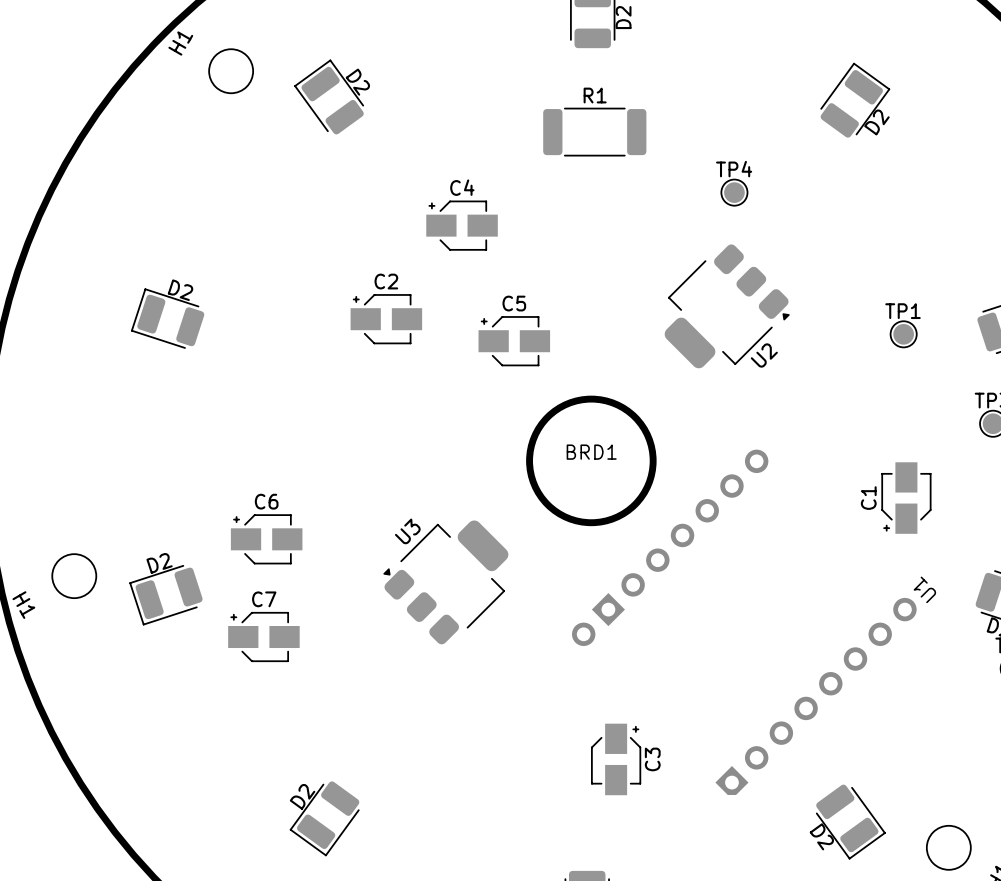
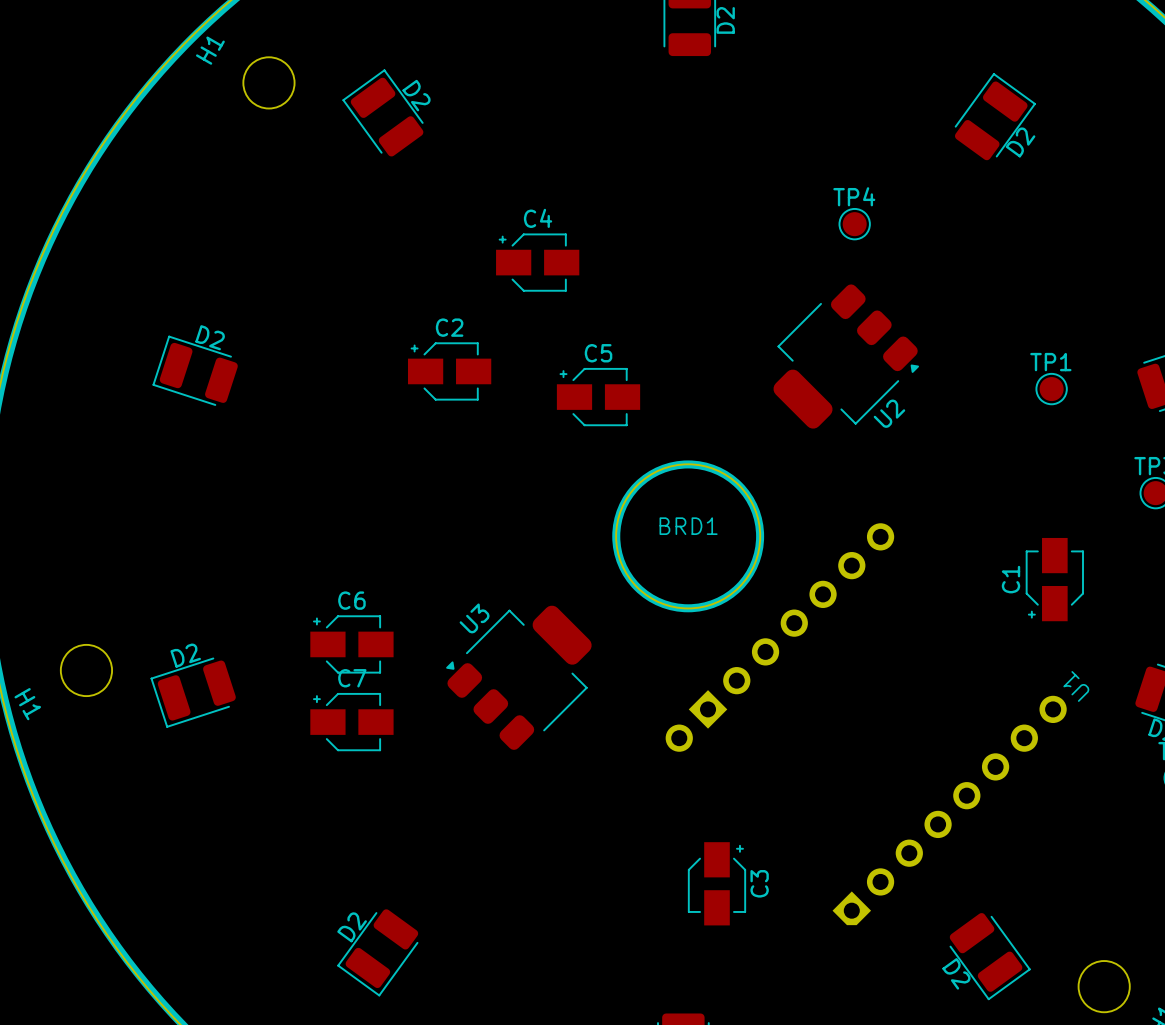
R1: (594, 132) -> none
C6 position: (266, 539) -> (351, 644)
C7 position: (263, 637) -> (351, 722)

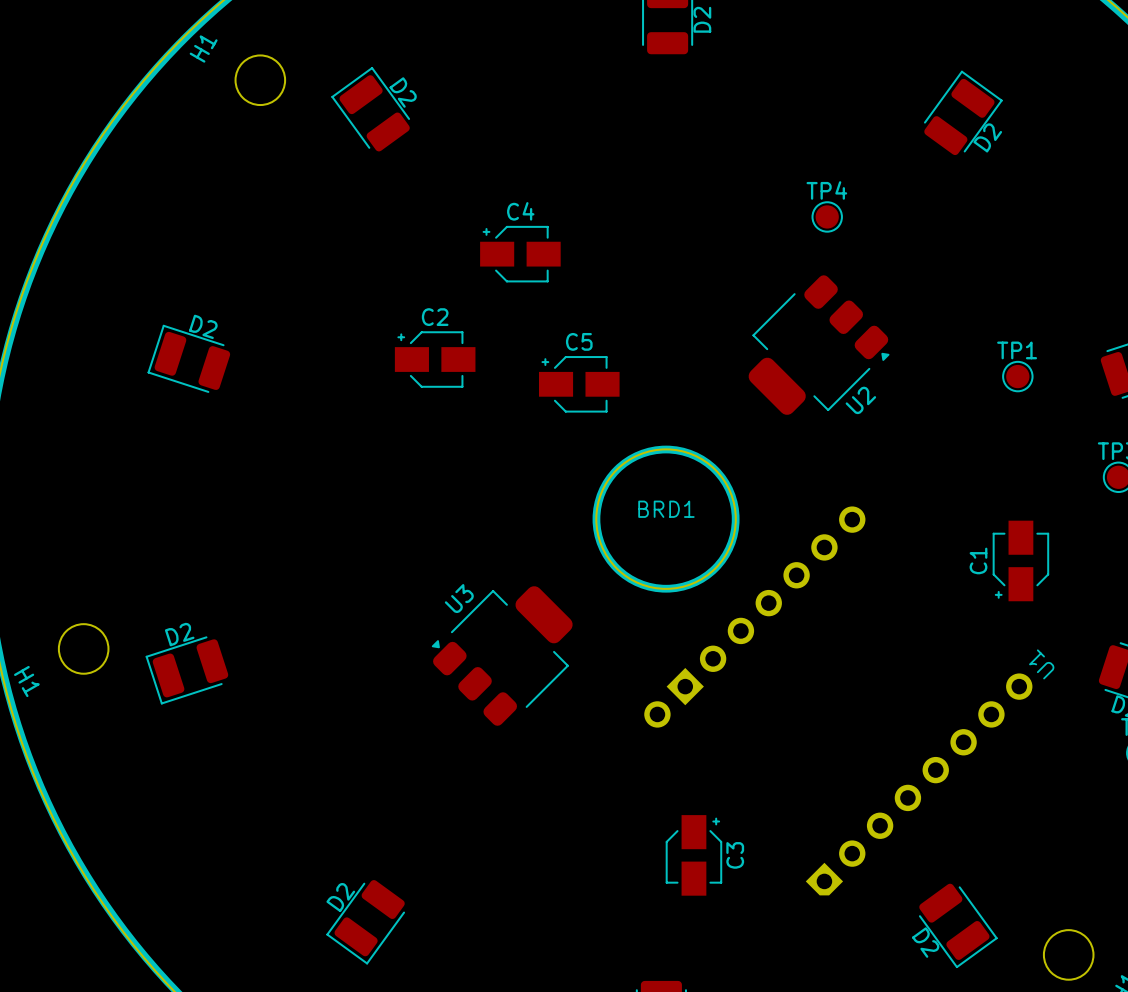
C6: (351, 644) -> none
C7: (351, 722) -> none

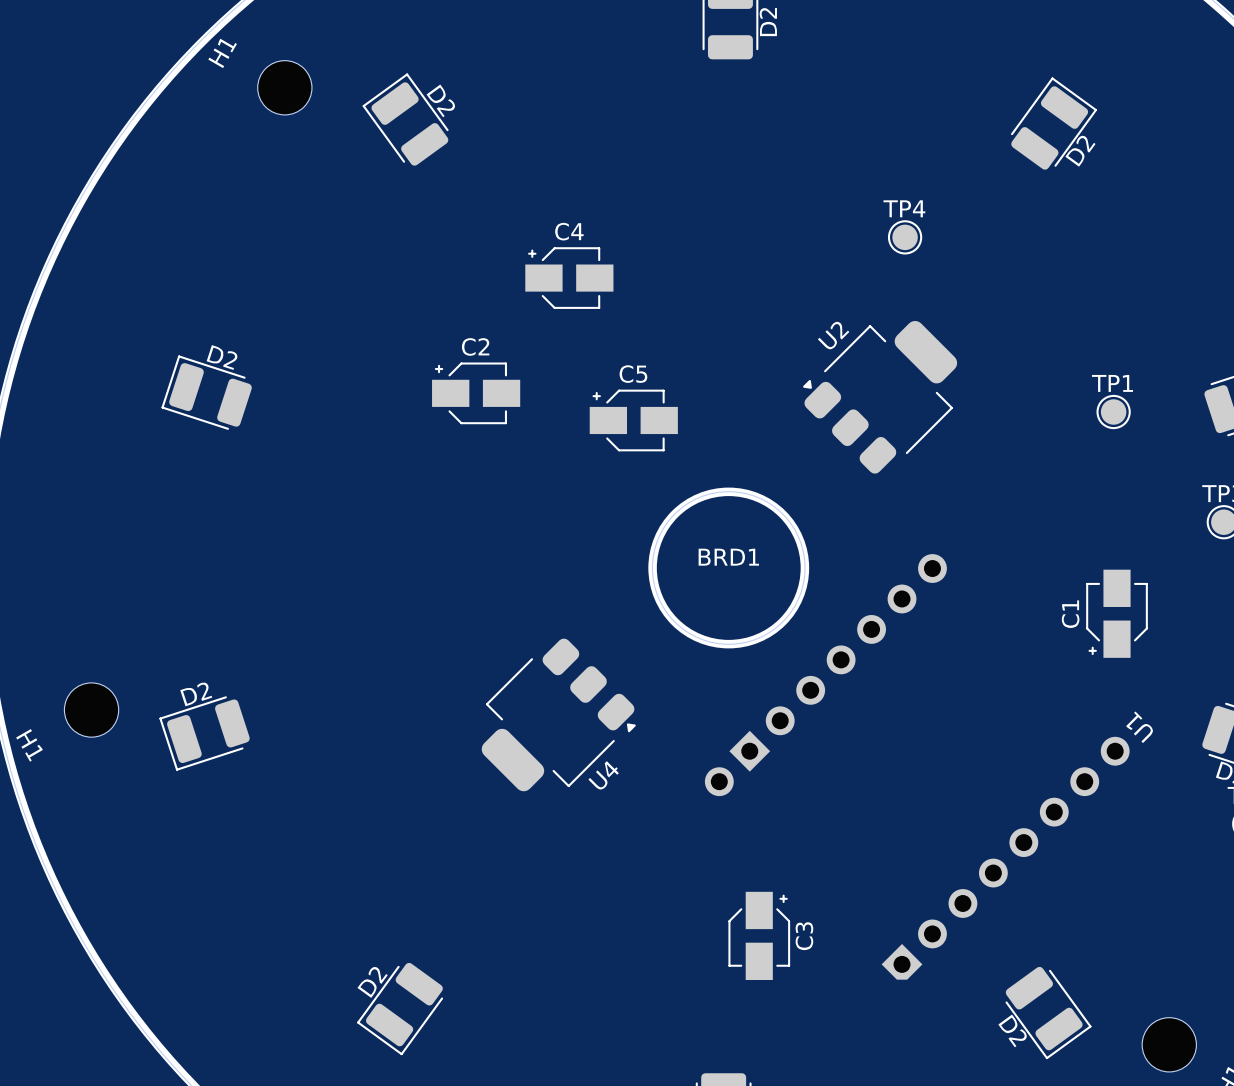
U2 rotation: 0° (819, 345) -> 180° (880, 397)
U4: none -> (558, 714)
U3: (502, 655) -> none

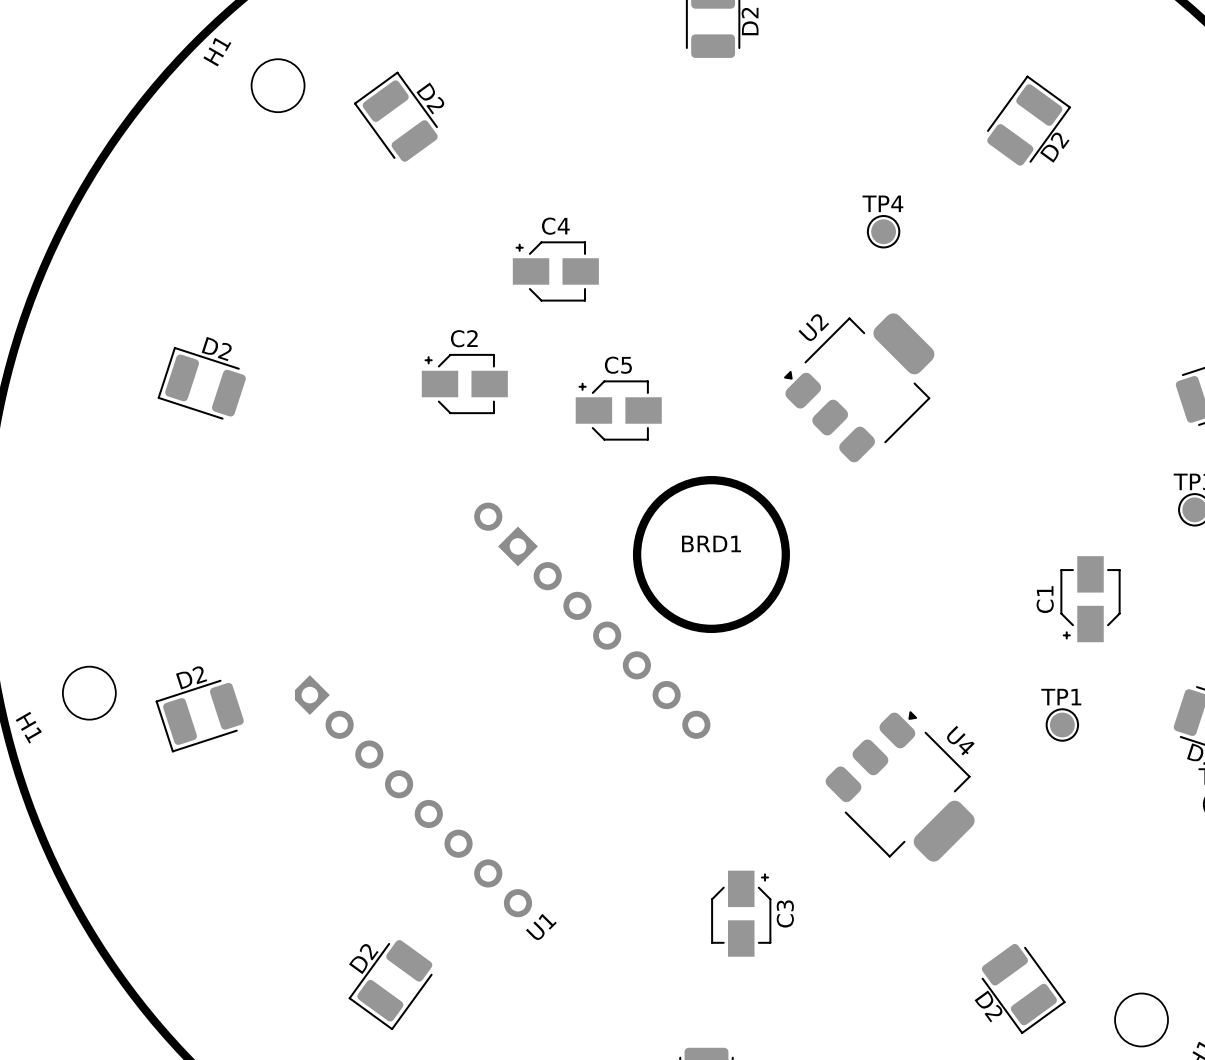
TP1 position: (1113, 412) -> (1062, 724)
U4 rotation: 0° (558, 714) -> 90° counterclockwise (900, 786)
U4 position: (558, 714) -> (900, 786)
U1 rotation: 0° (917, 766) -> 90° clockwise (502, 709)
U1 position: (917, 766) -> (502, 709)

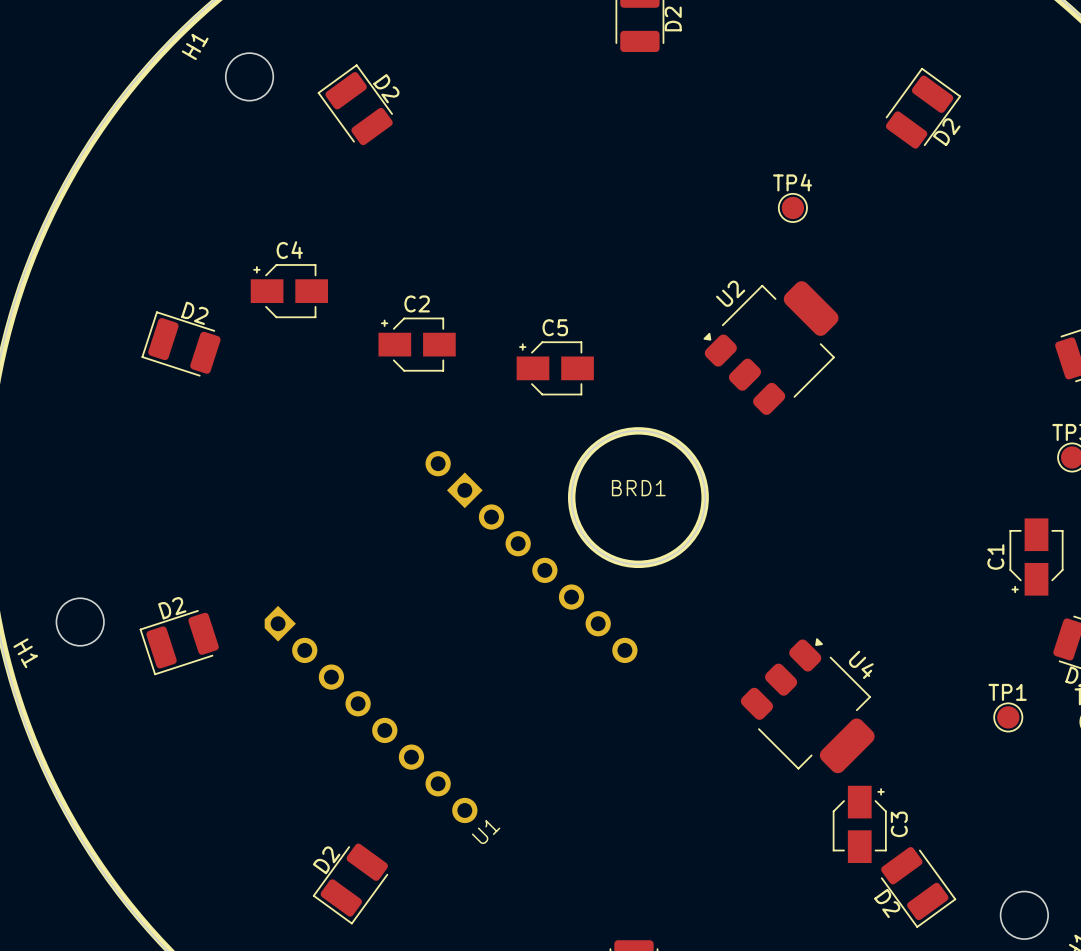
C4 position: (555, 271) -> (289, 291)
C1 position: (1090, 599) -> (1036, 557)
TP1 position: (1062, 724) -> (1008, 717)
C3 position: (741, 913) -> (859, 824)

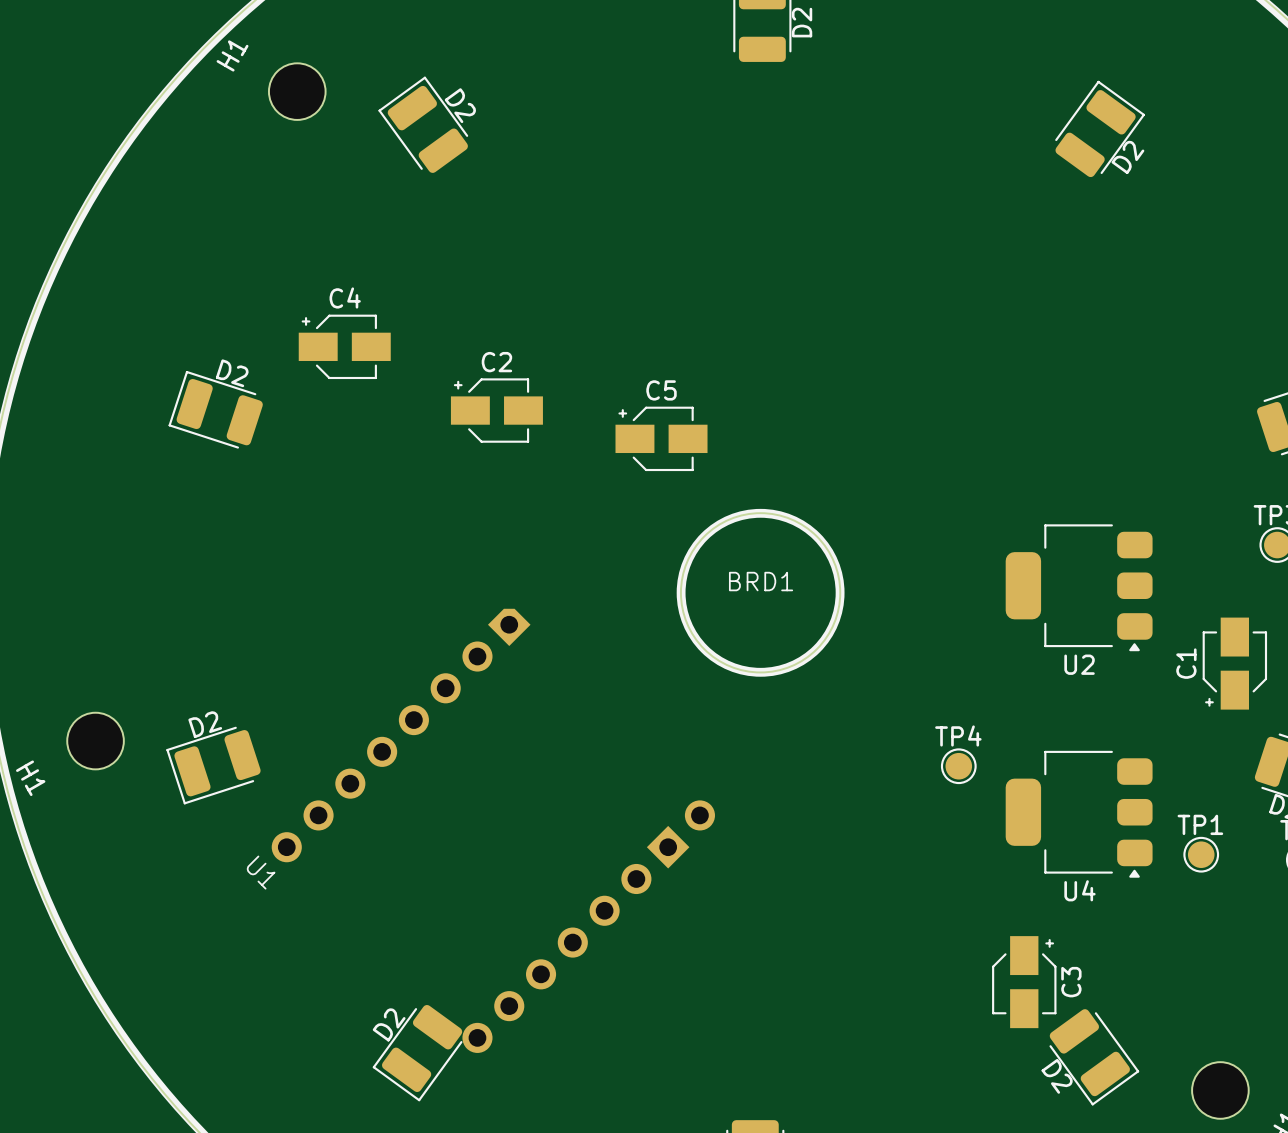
TP4 position: (792, 207) -> (958, 766)
U2 rotation: 0° (771, 348) -> 135° counterclockwise (1079, 587)
U2 position: (771, 348) -> (1079, 587)
U1 rotation: 0° (451, 637) -> 90° clockwise (493, 830)
U4 rotation: 0° (807, 705) -> 135° clockwise (1079, 814)
U4 position: (807, 705) -> (1079, 814)

